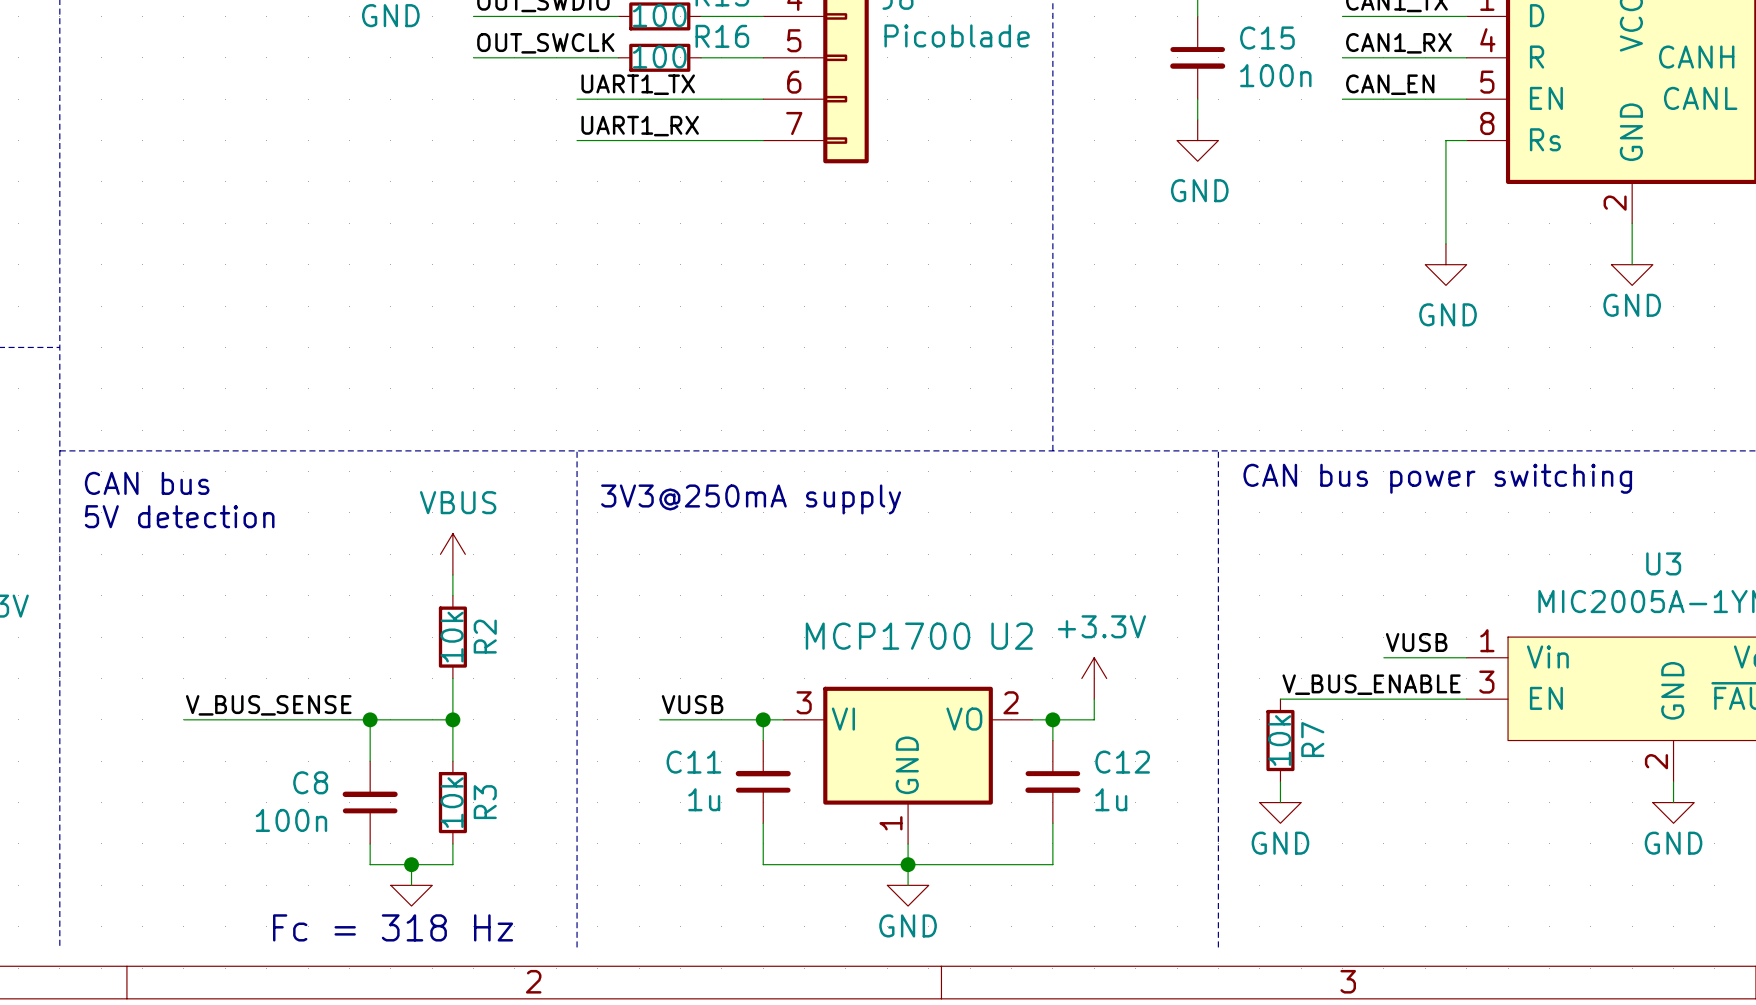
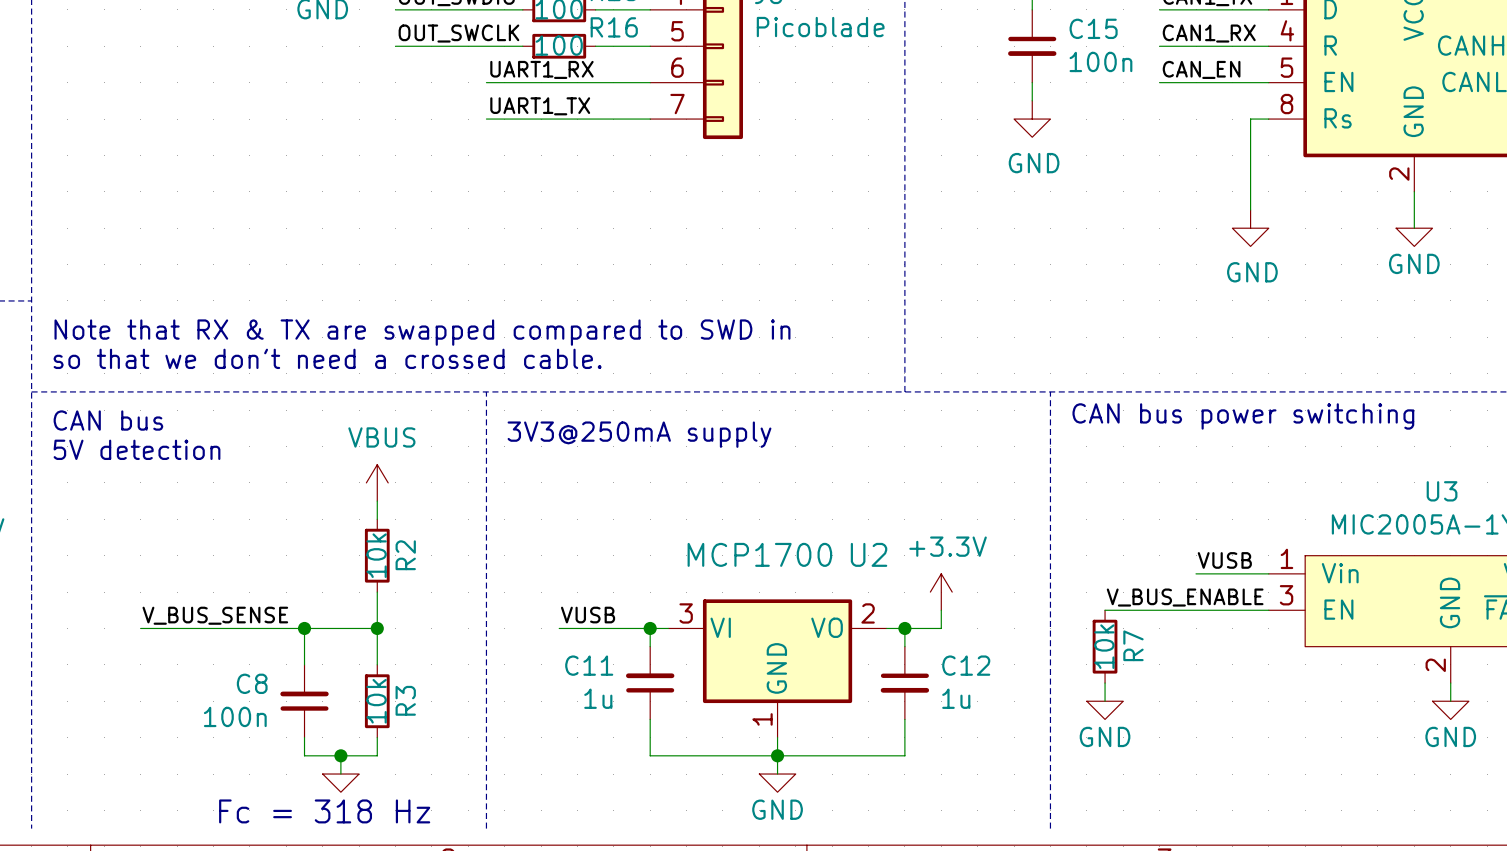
label: UART1_TX (638, 84) -> UART1_RX (541, 69)
label: UART1_RX (640, 126) -> UART1_TX (540, 106)
text: none -> Note that RX & TX are swapped compared to SWD in (422, 332)
text: none -> so that we don't need a crossed cable. (327, 358)

